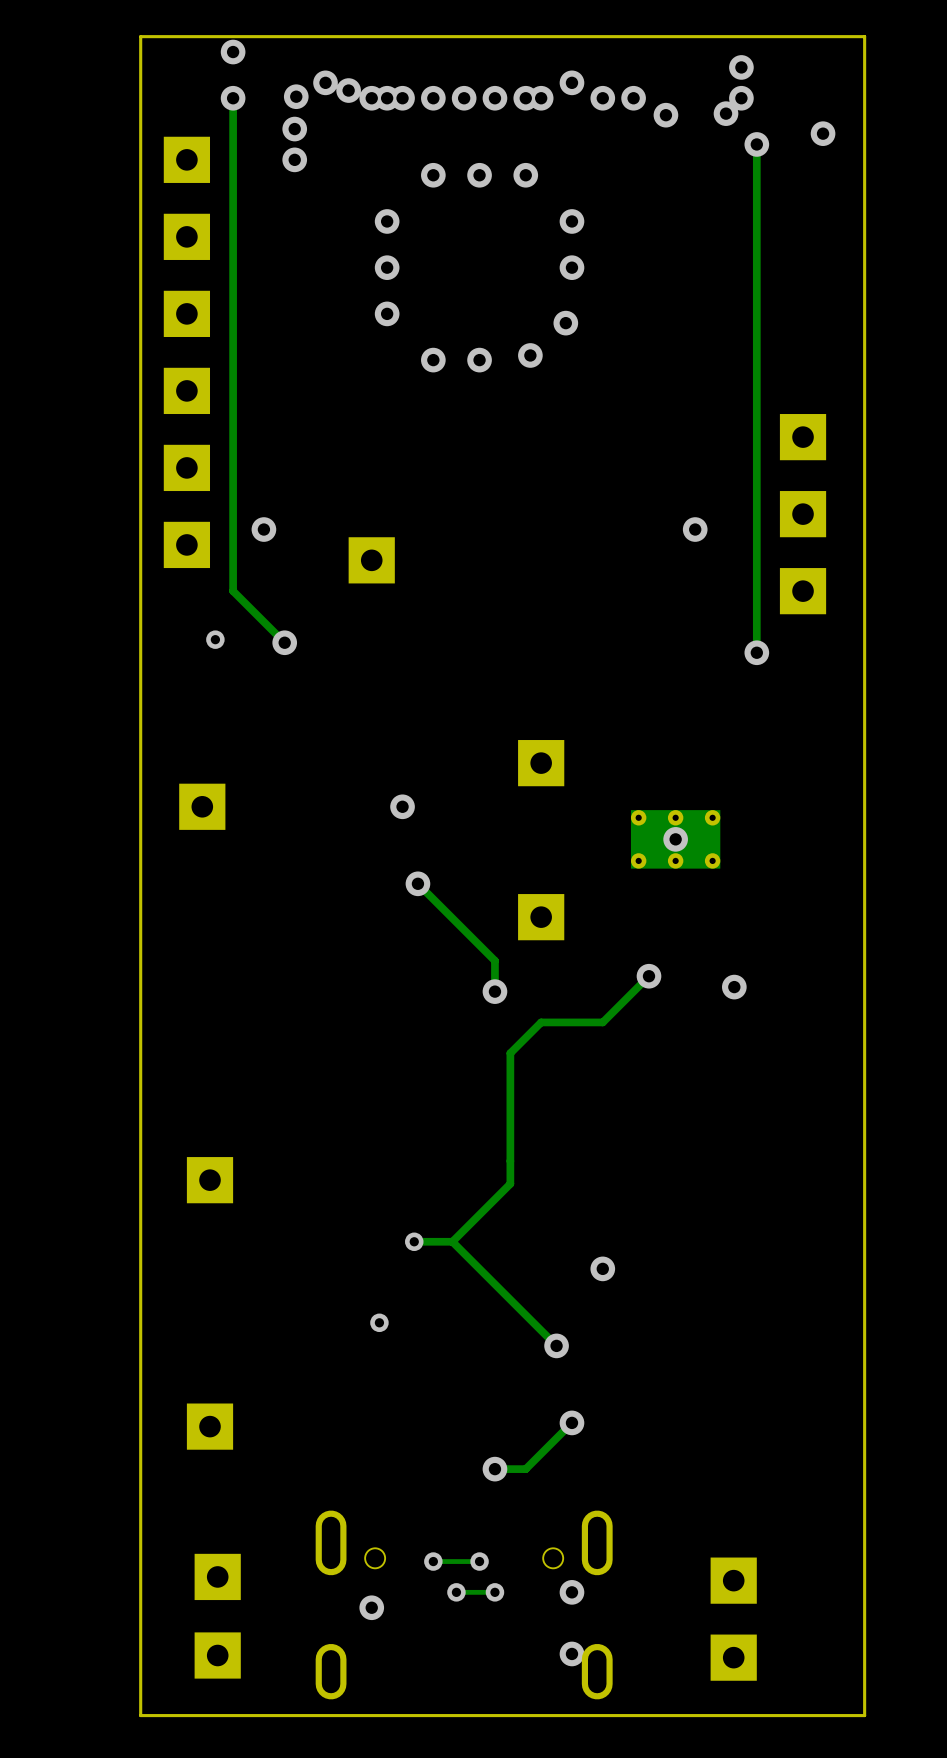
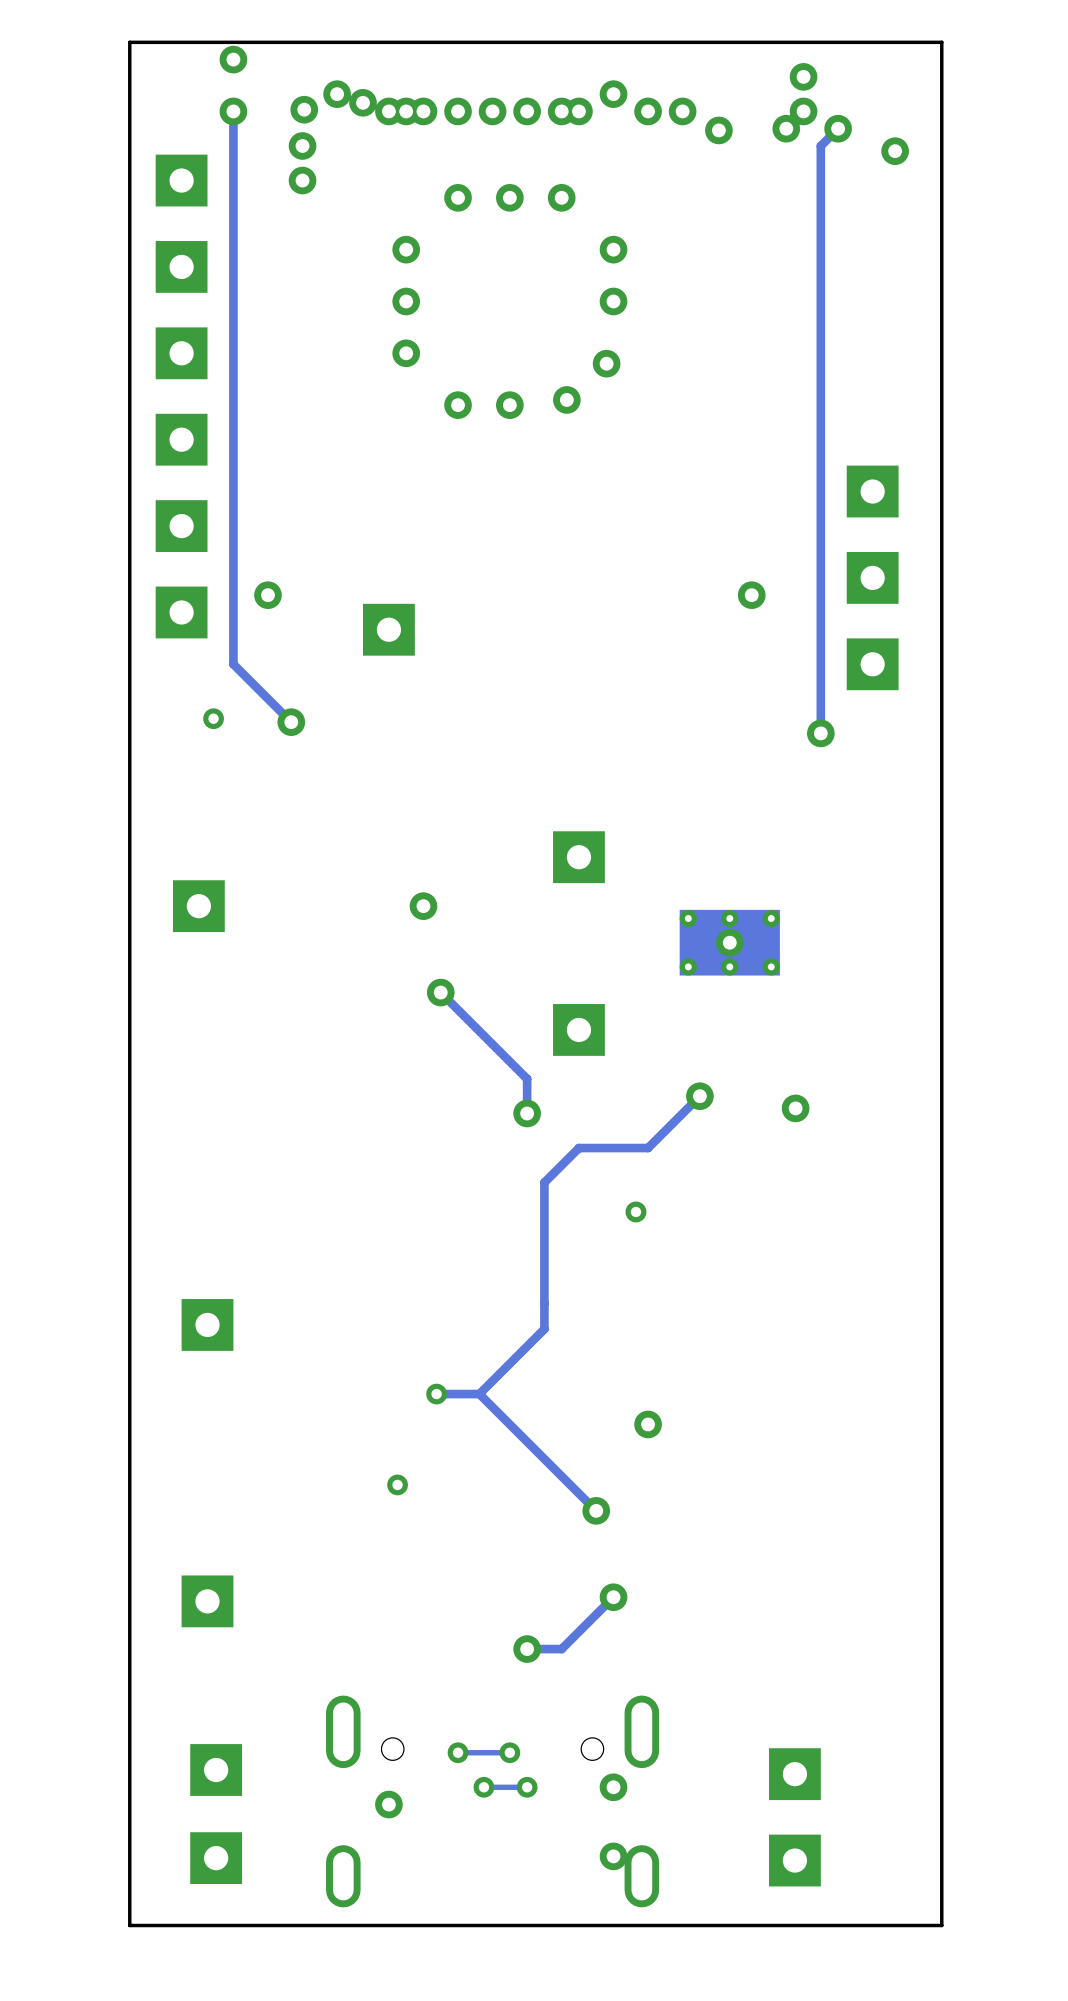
track: none -> (838, 128) (820, 145) (820, 163)
via position: (756, 144) -> (838, 128)
via: none -> (635, 1211)

